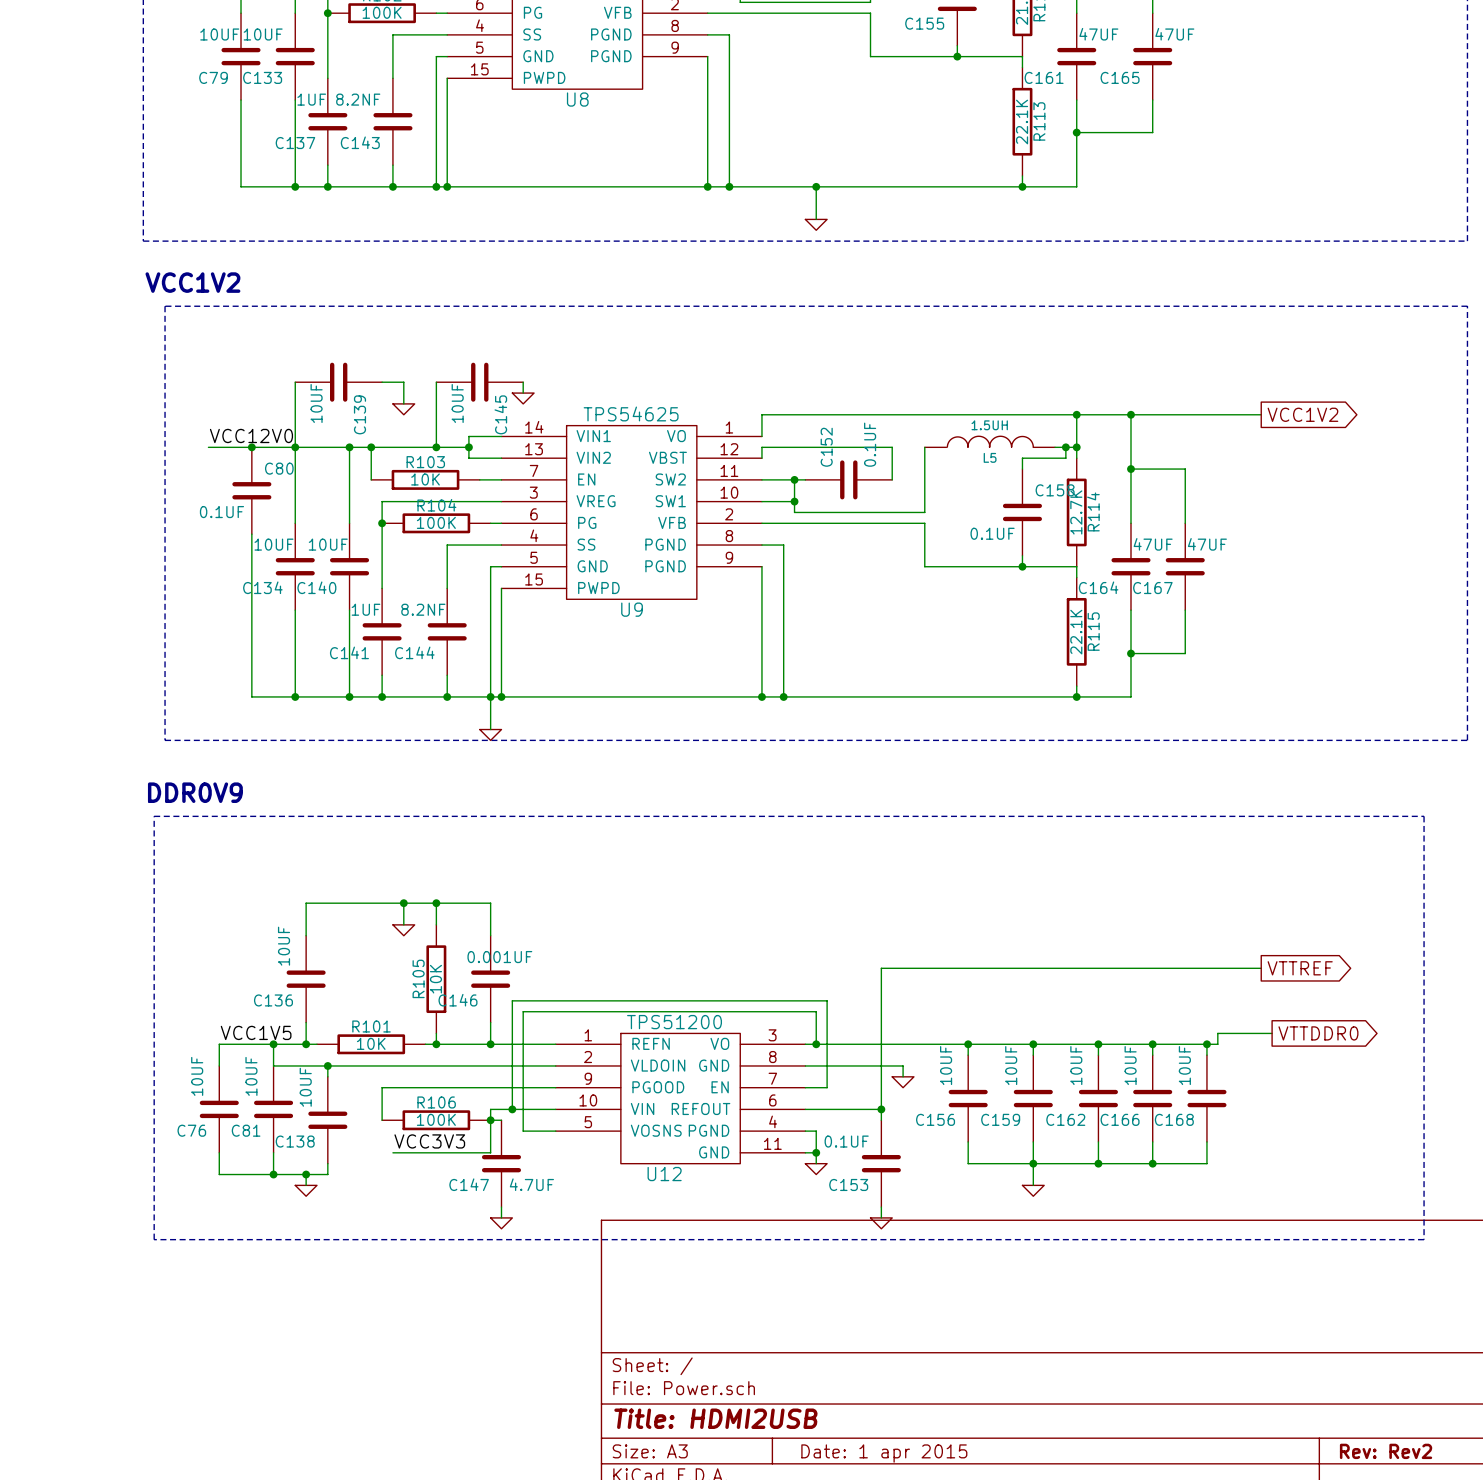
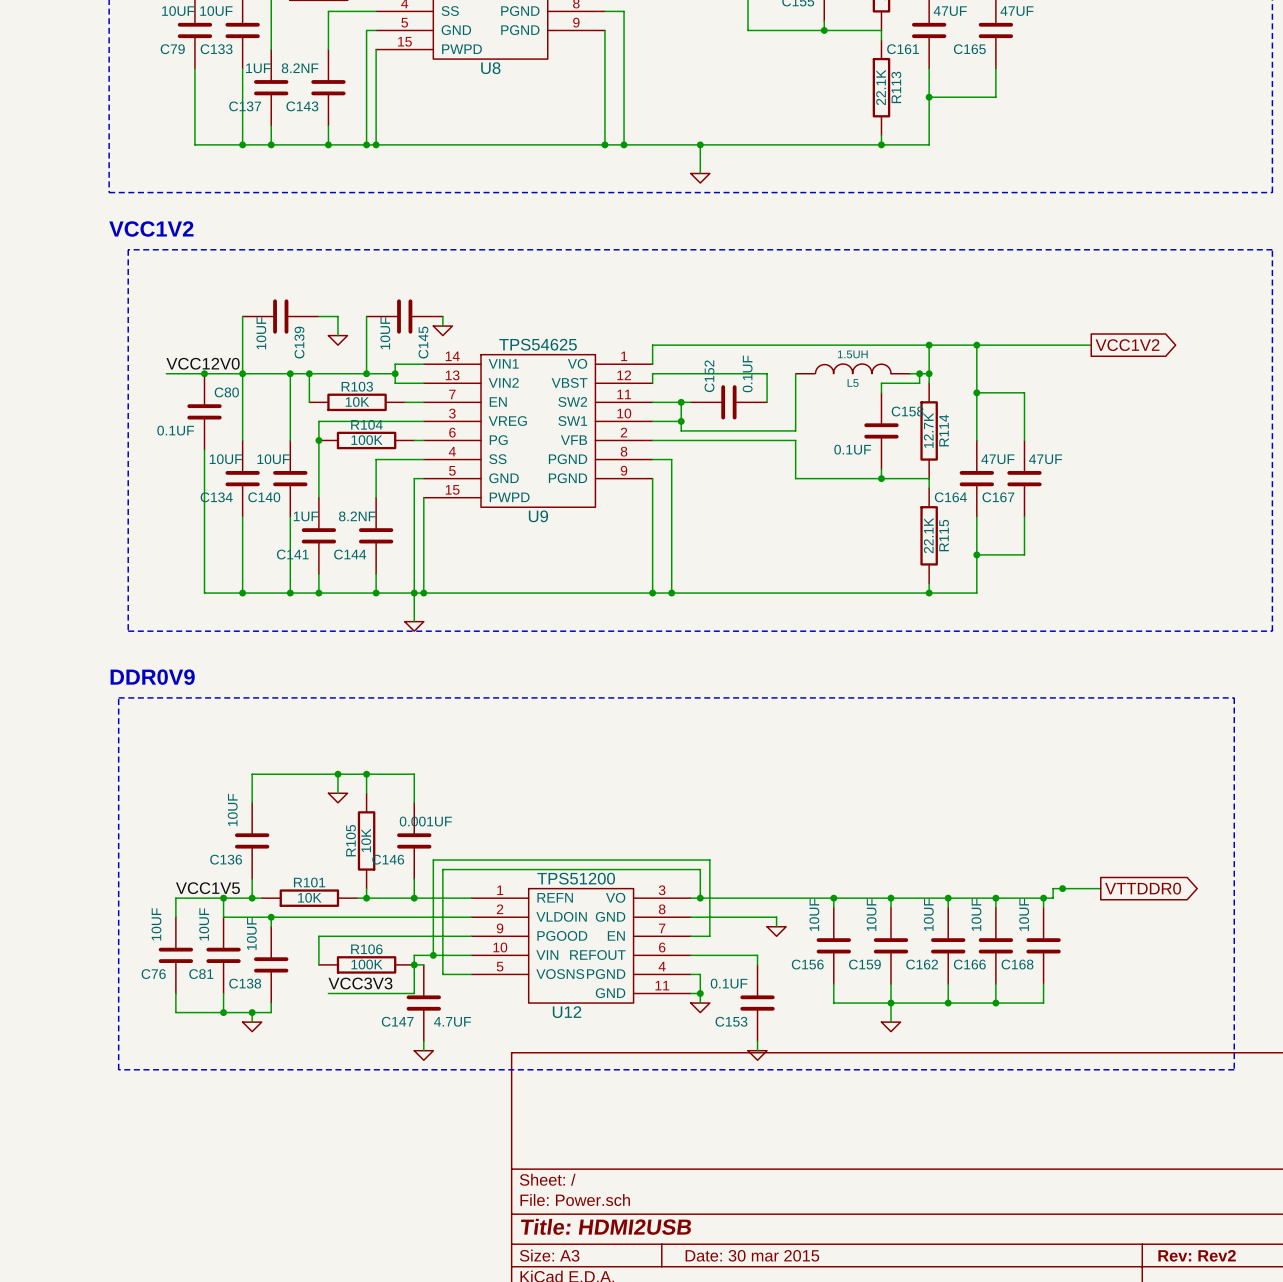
wire: (1261, 968) (881, 968) (881, 1109) -> none
global label: VTTREF (1300, 968) -> none
junction: none -> (1062, 888)
junction: (881, 1109) -> none
title block: Date: 1 apr 2015 (884, 1453) -> Date: 30 mar 2015 (752, 1255)

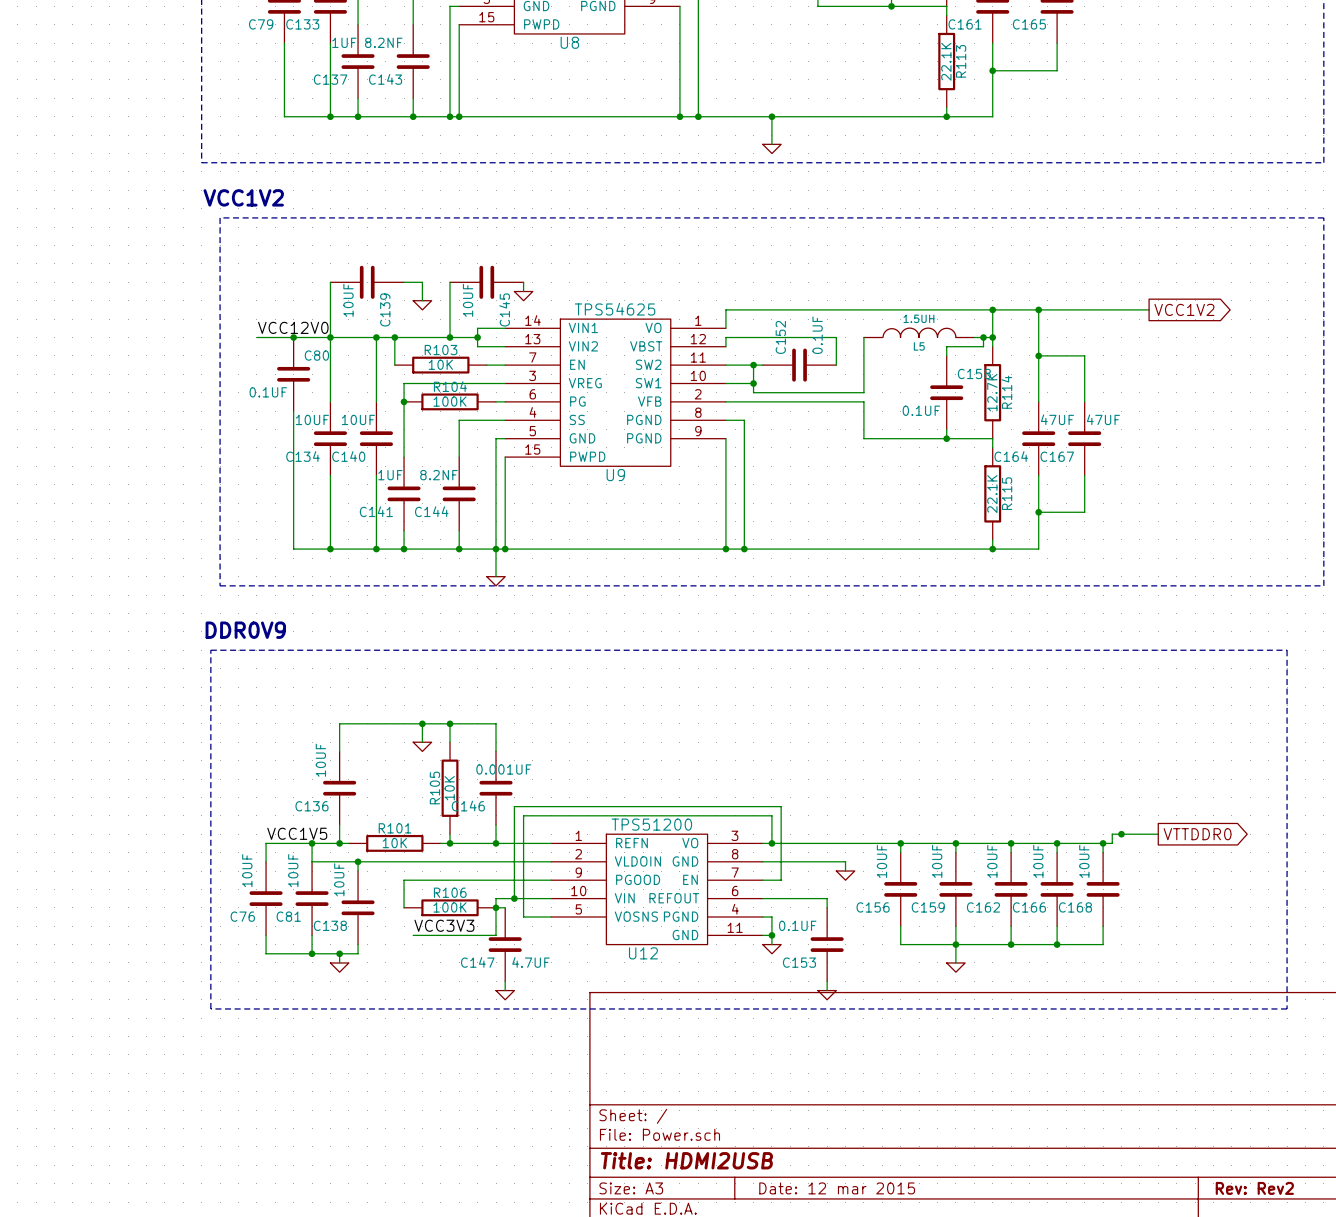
title block: Date: 30 mar 2015 (752, 1255) -> Date: 12 mar 2015 (837, 1188)

